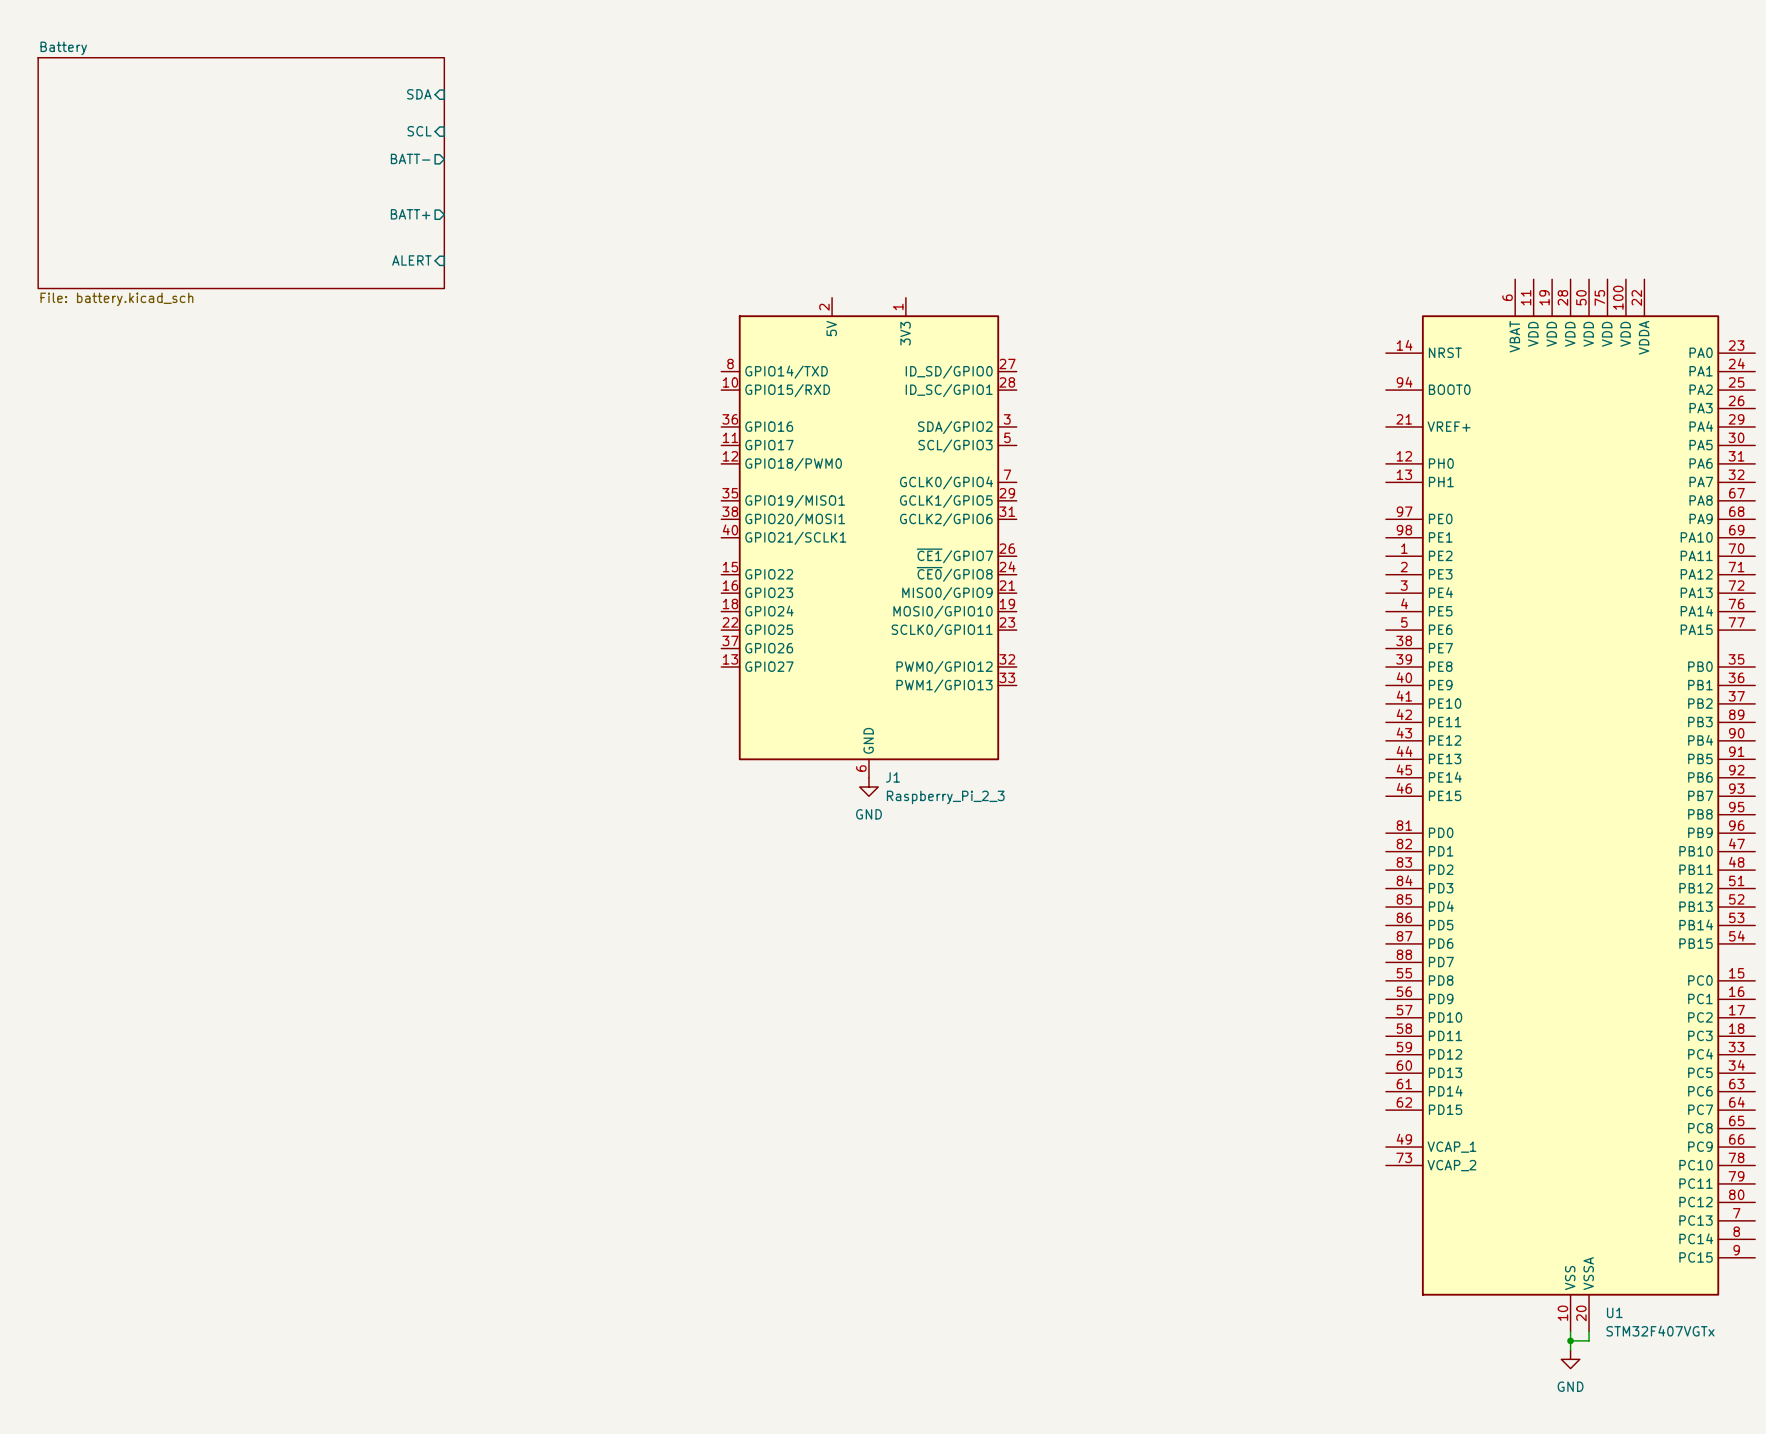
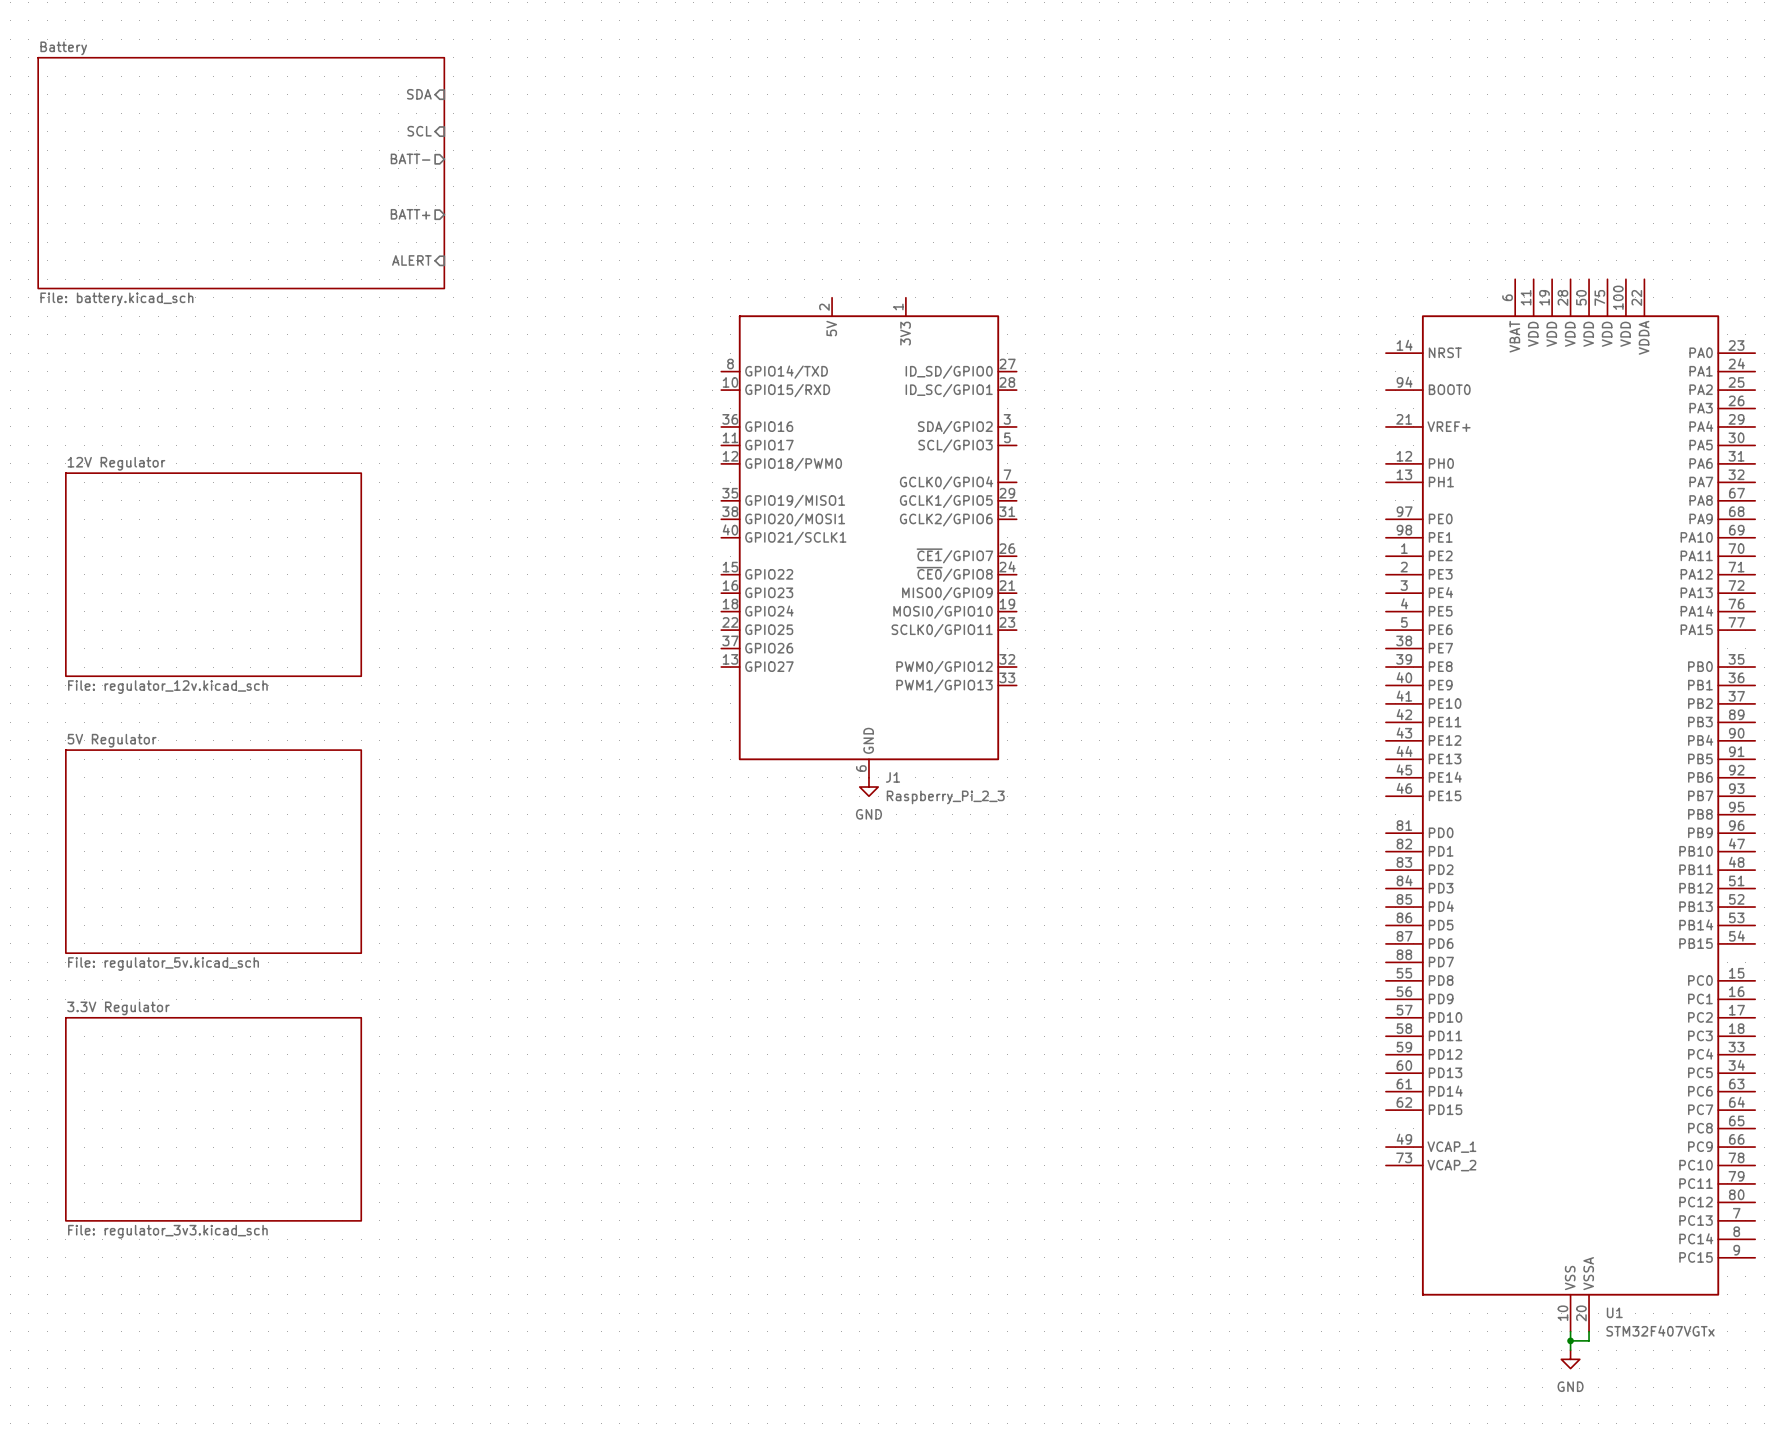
sheet 12V Regulator: none -> File: regulator_12v.kicad_sch (213, 574)
sheet 5V Regulator: none -> File: regulator_5v.kicad_sch (213, 851)
sheet 3.3V Regulator: none -> File: regulator_3v3.kicad_sch (213, 1119)

